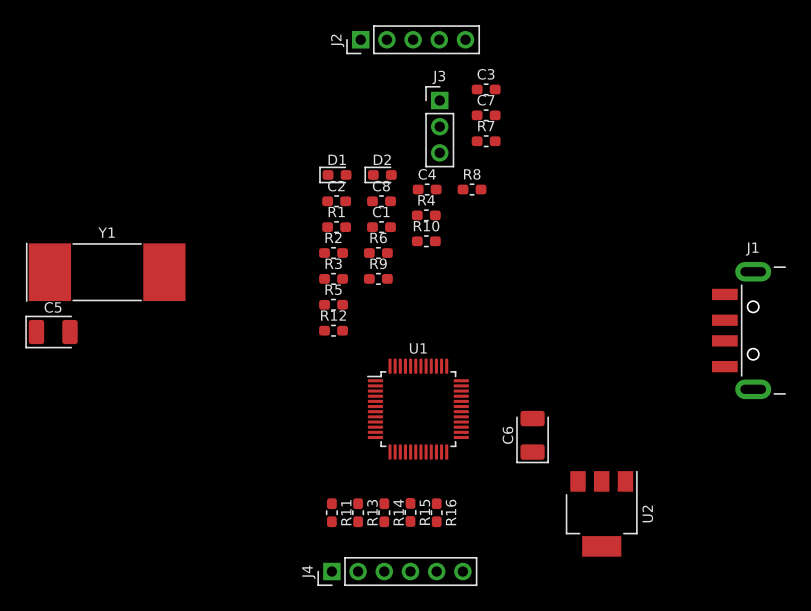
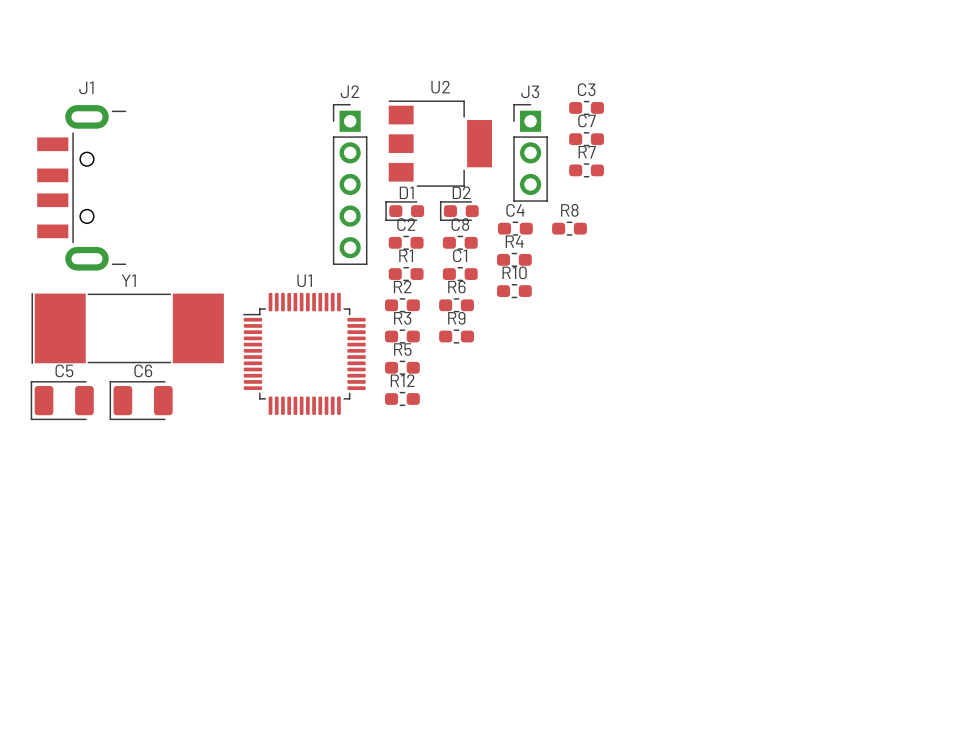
J2 rotation: 0° (413, 39) -> 90° clockwise (350, 184)
J2 position: (413, 39) -> (350, 184)
J1 position: (748, 330) -> (81, 187)
U1 position: (418, 409) -> (304, 353)
C6 rotation: 0° (532, 436) -> 90° clockwise (141, 400)
C6 position: (532, 436) -> (141, 400)
R11: (331, 512) -> none
R13: (358, 512) -> none
R14: (384, 512) -> none
R15: (410, 512) -> none
R16: (436, 512) -> none
U2 rotation: 0° (601, 513) -> 90° counterclockwise (440, 143)
U2 position: (601, 513) -> (440, 143)
J4: (397, 571) -> none

